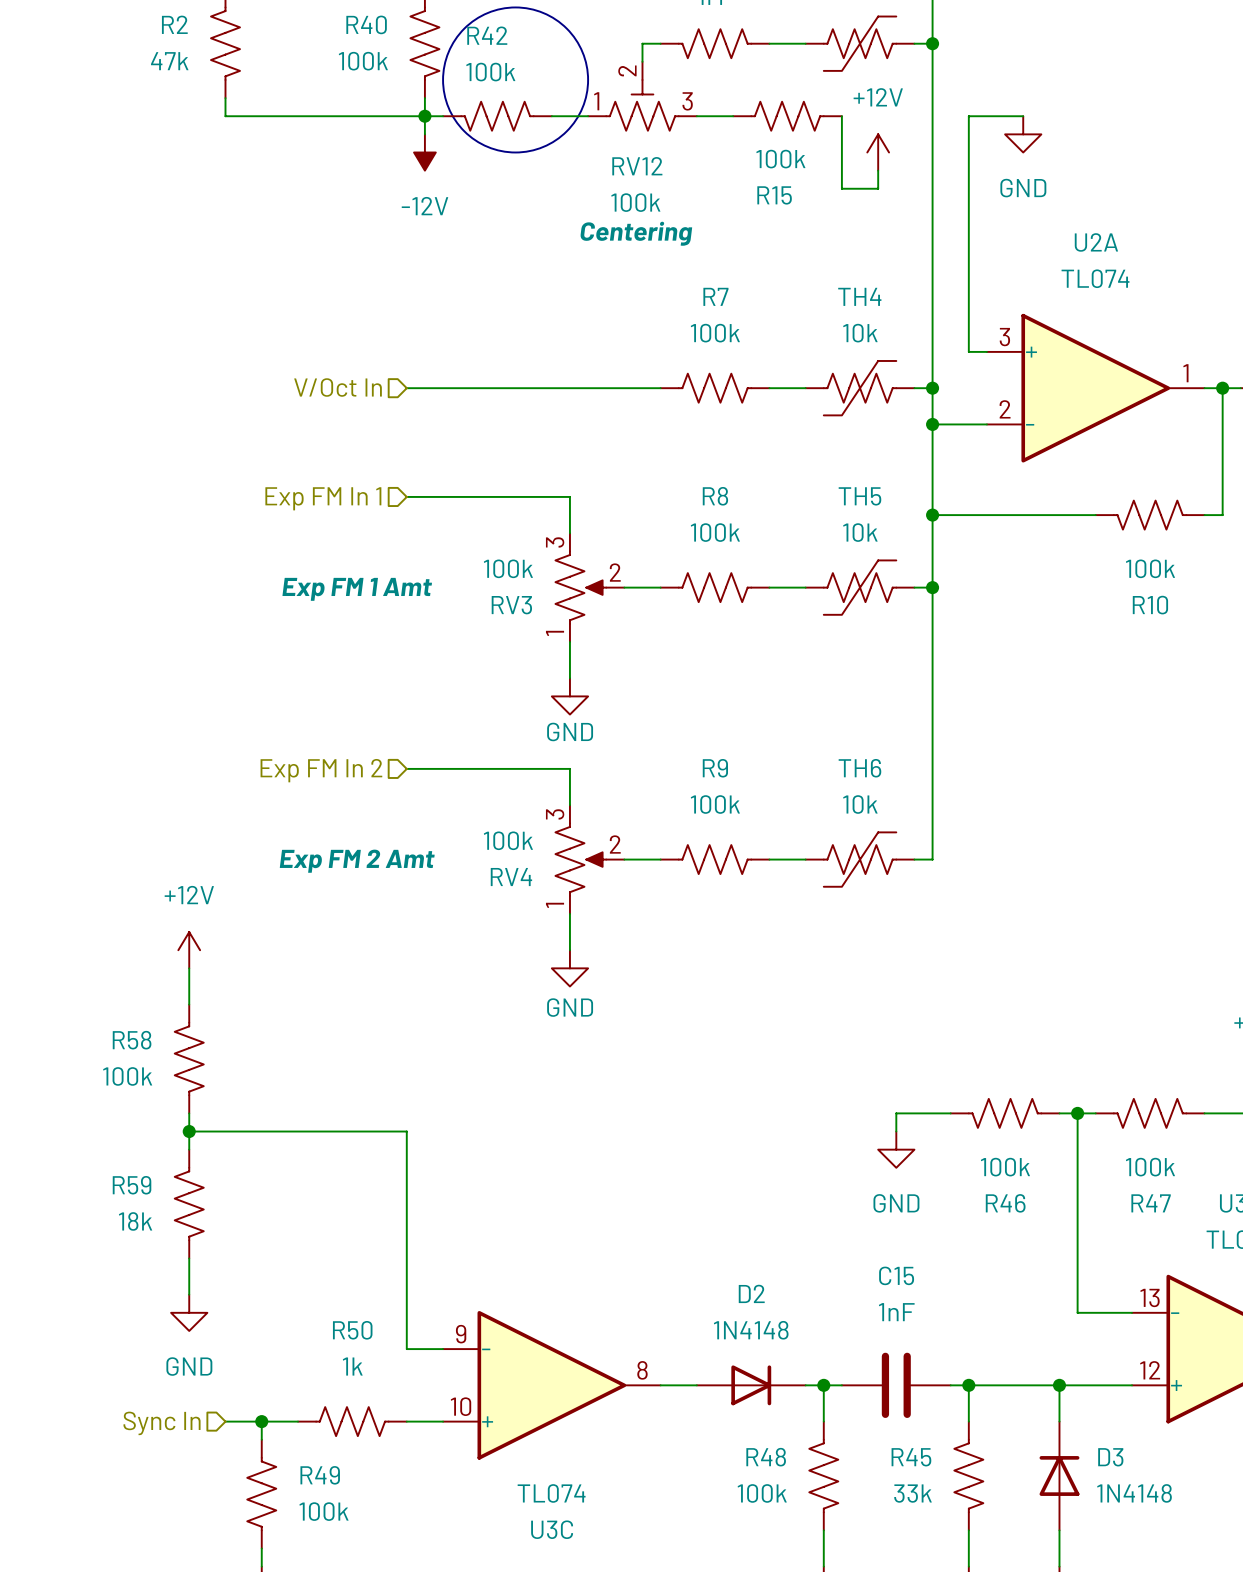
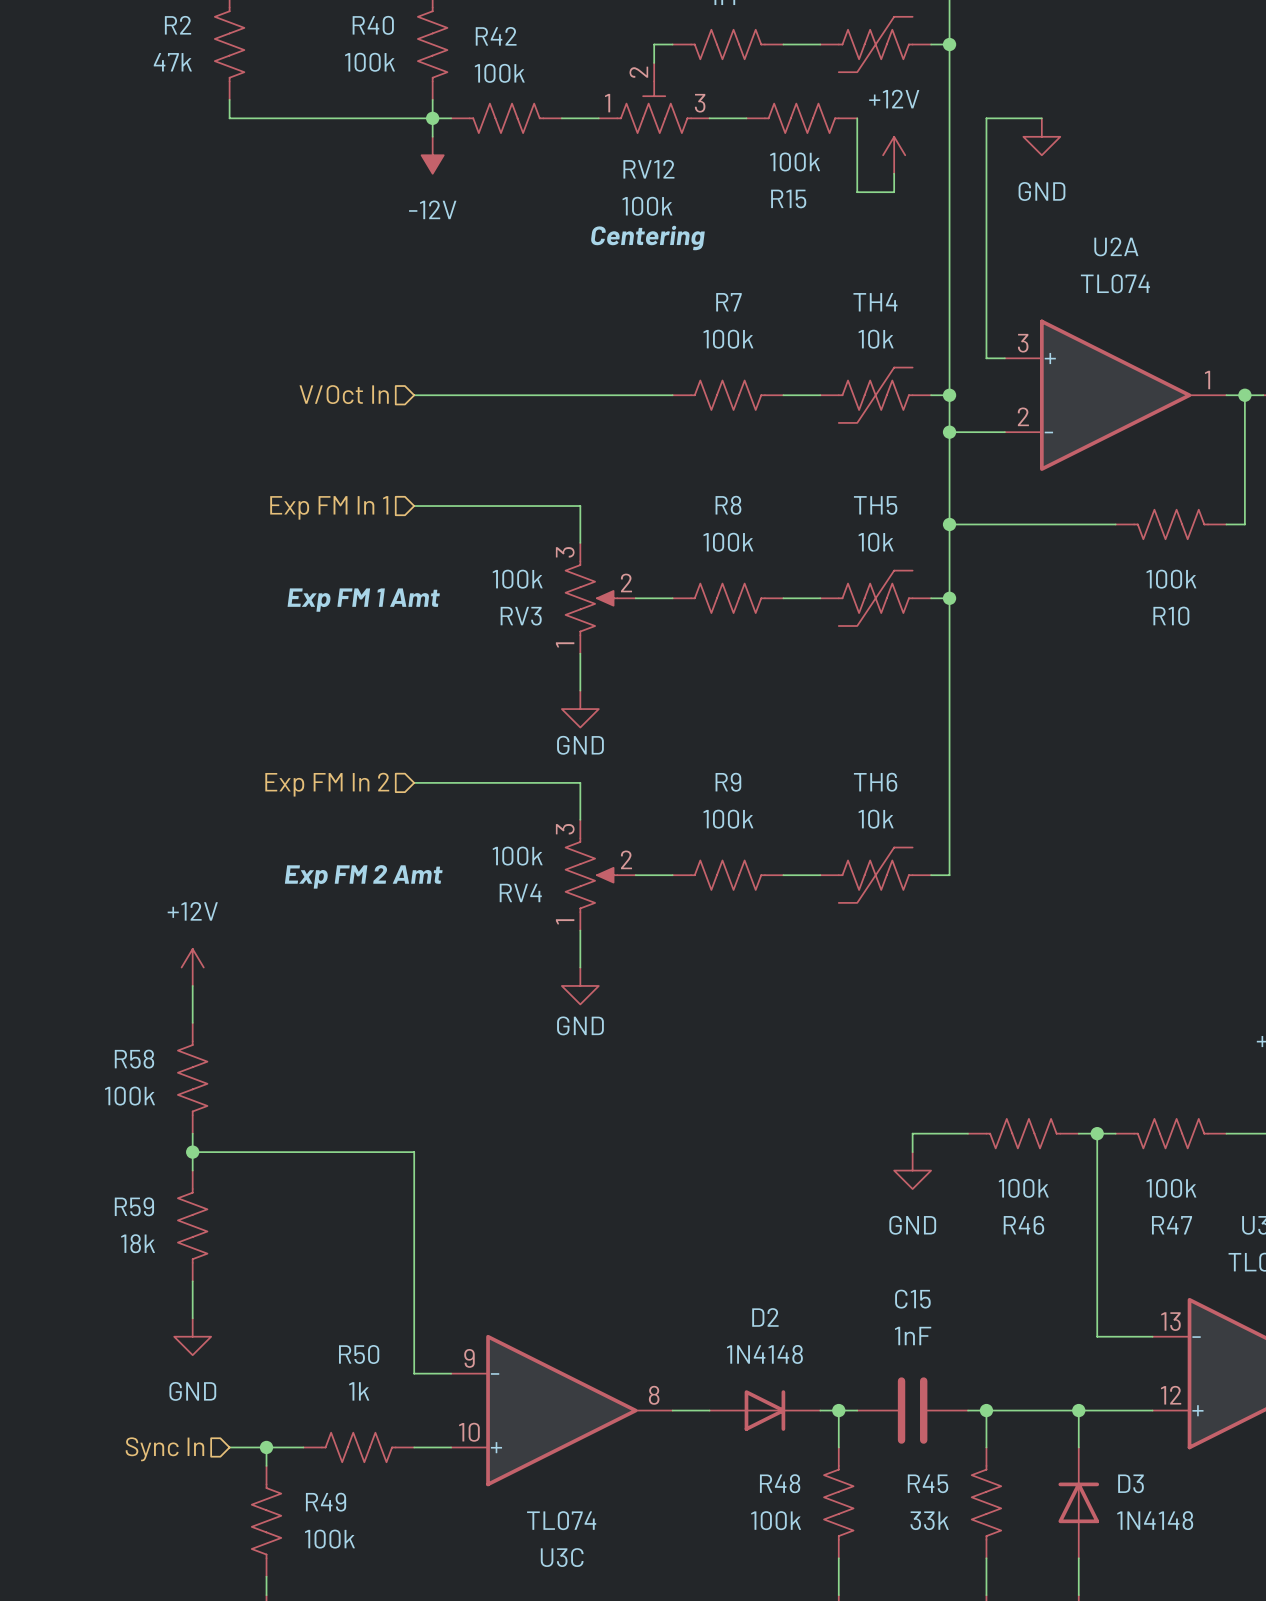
drawing: [443, 7, 589, 153] -> none

